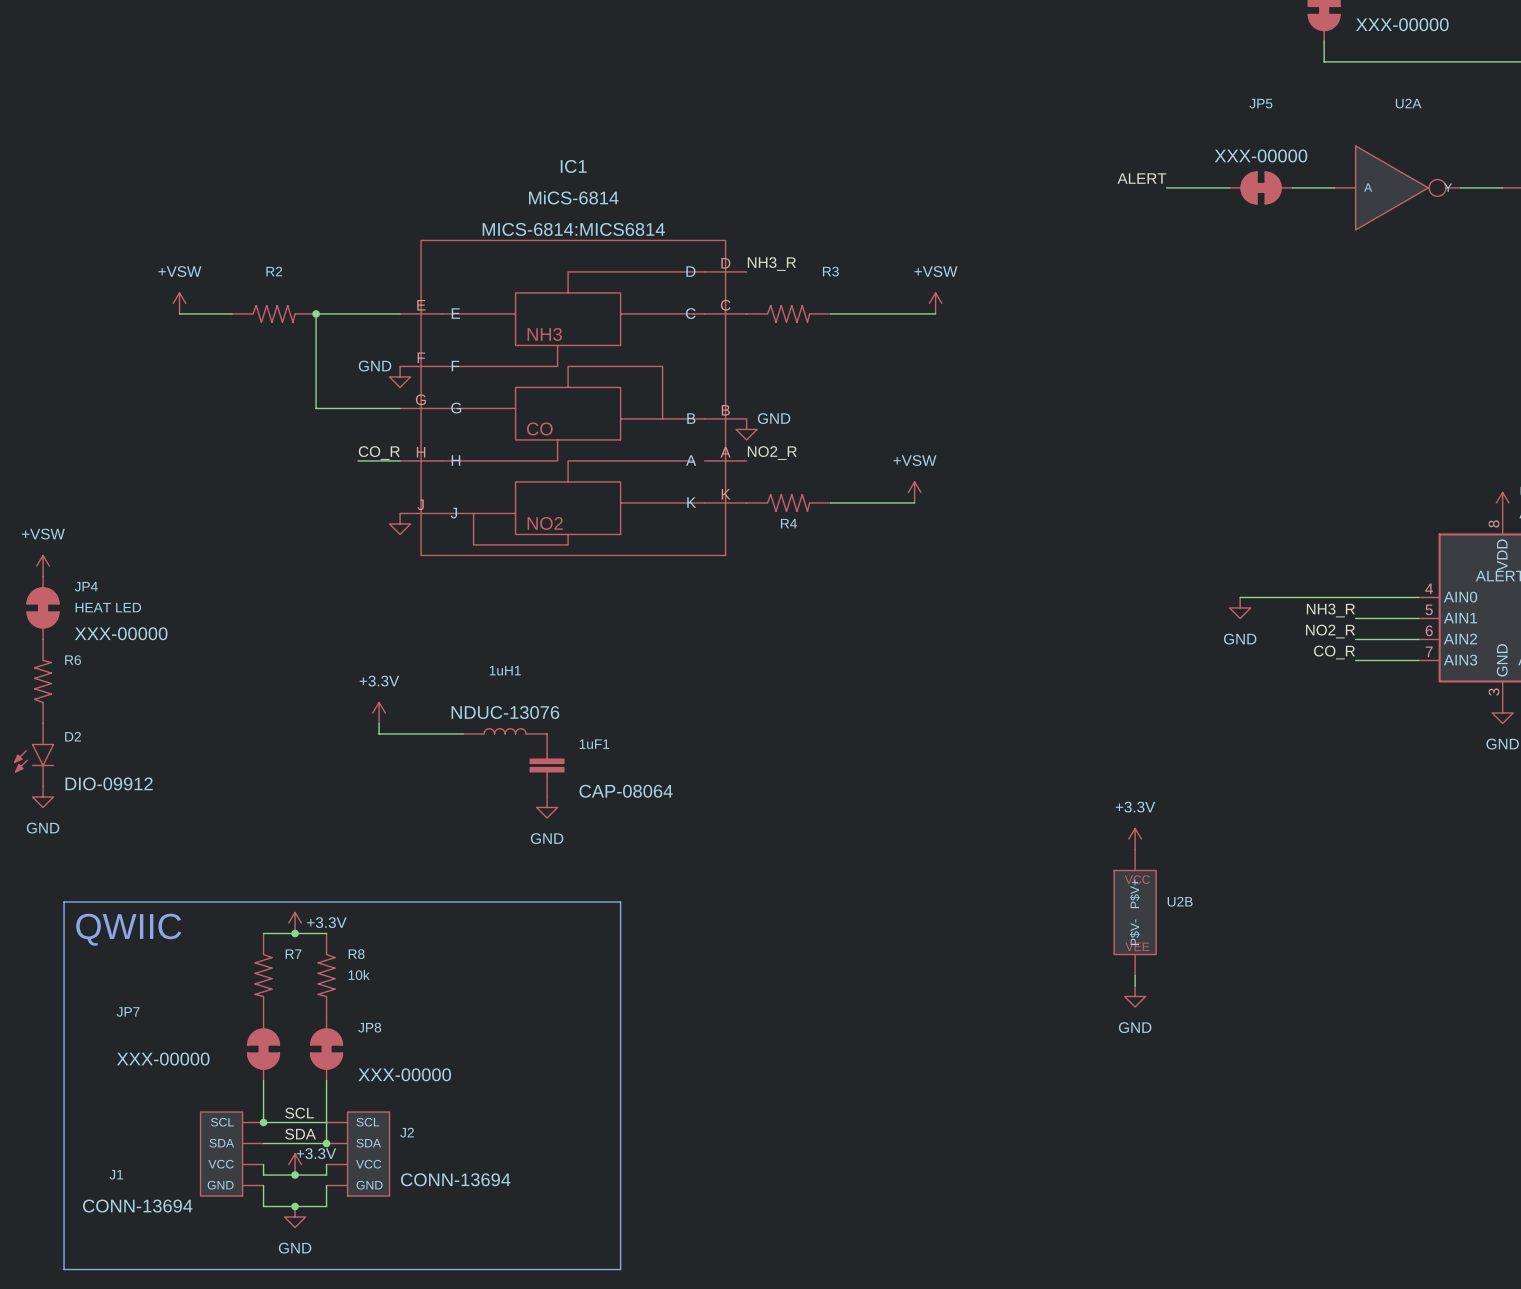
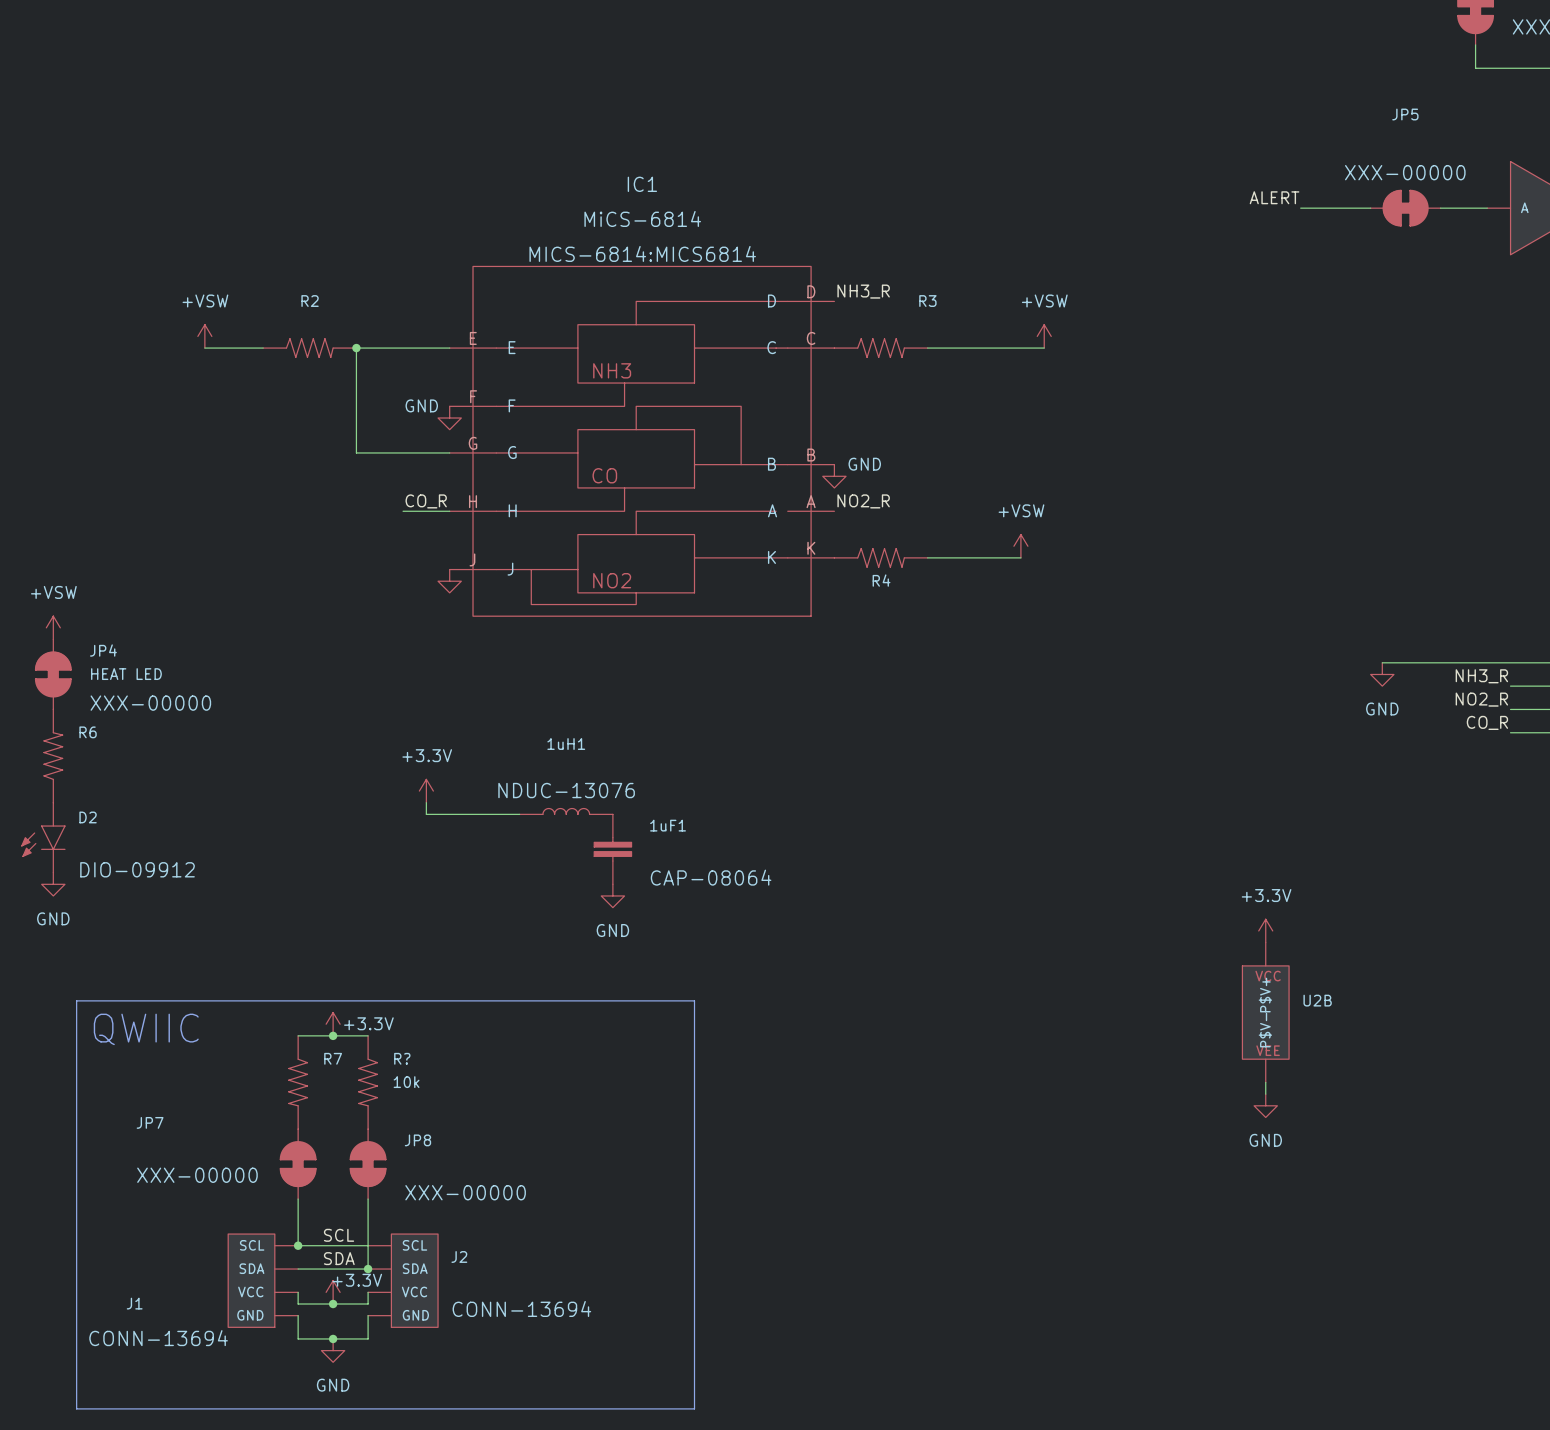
R8 name: R8 (356, 954) -> R? (402, 1058)

